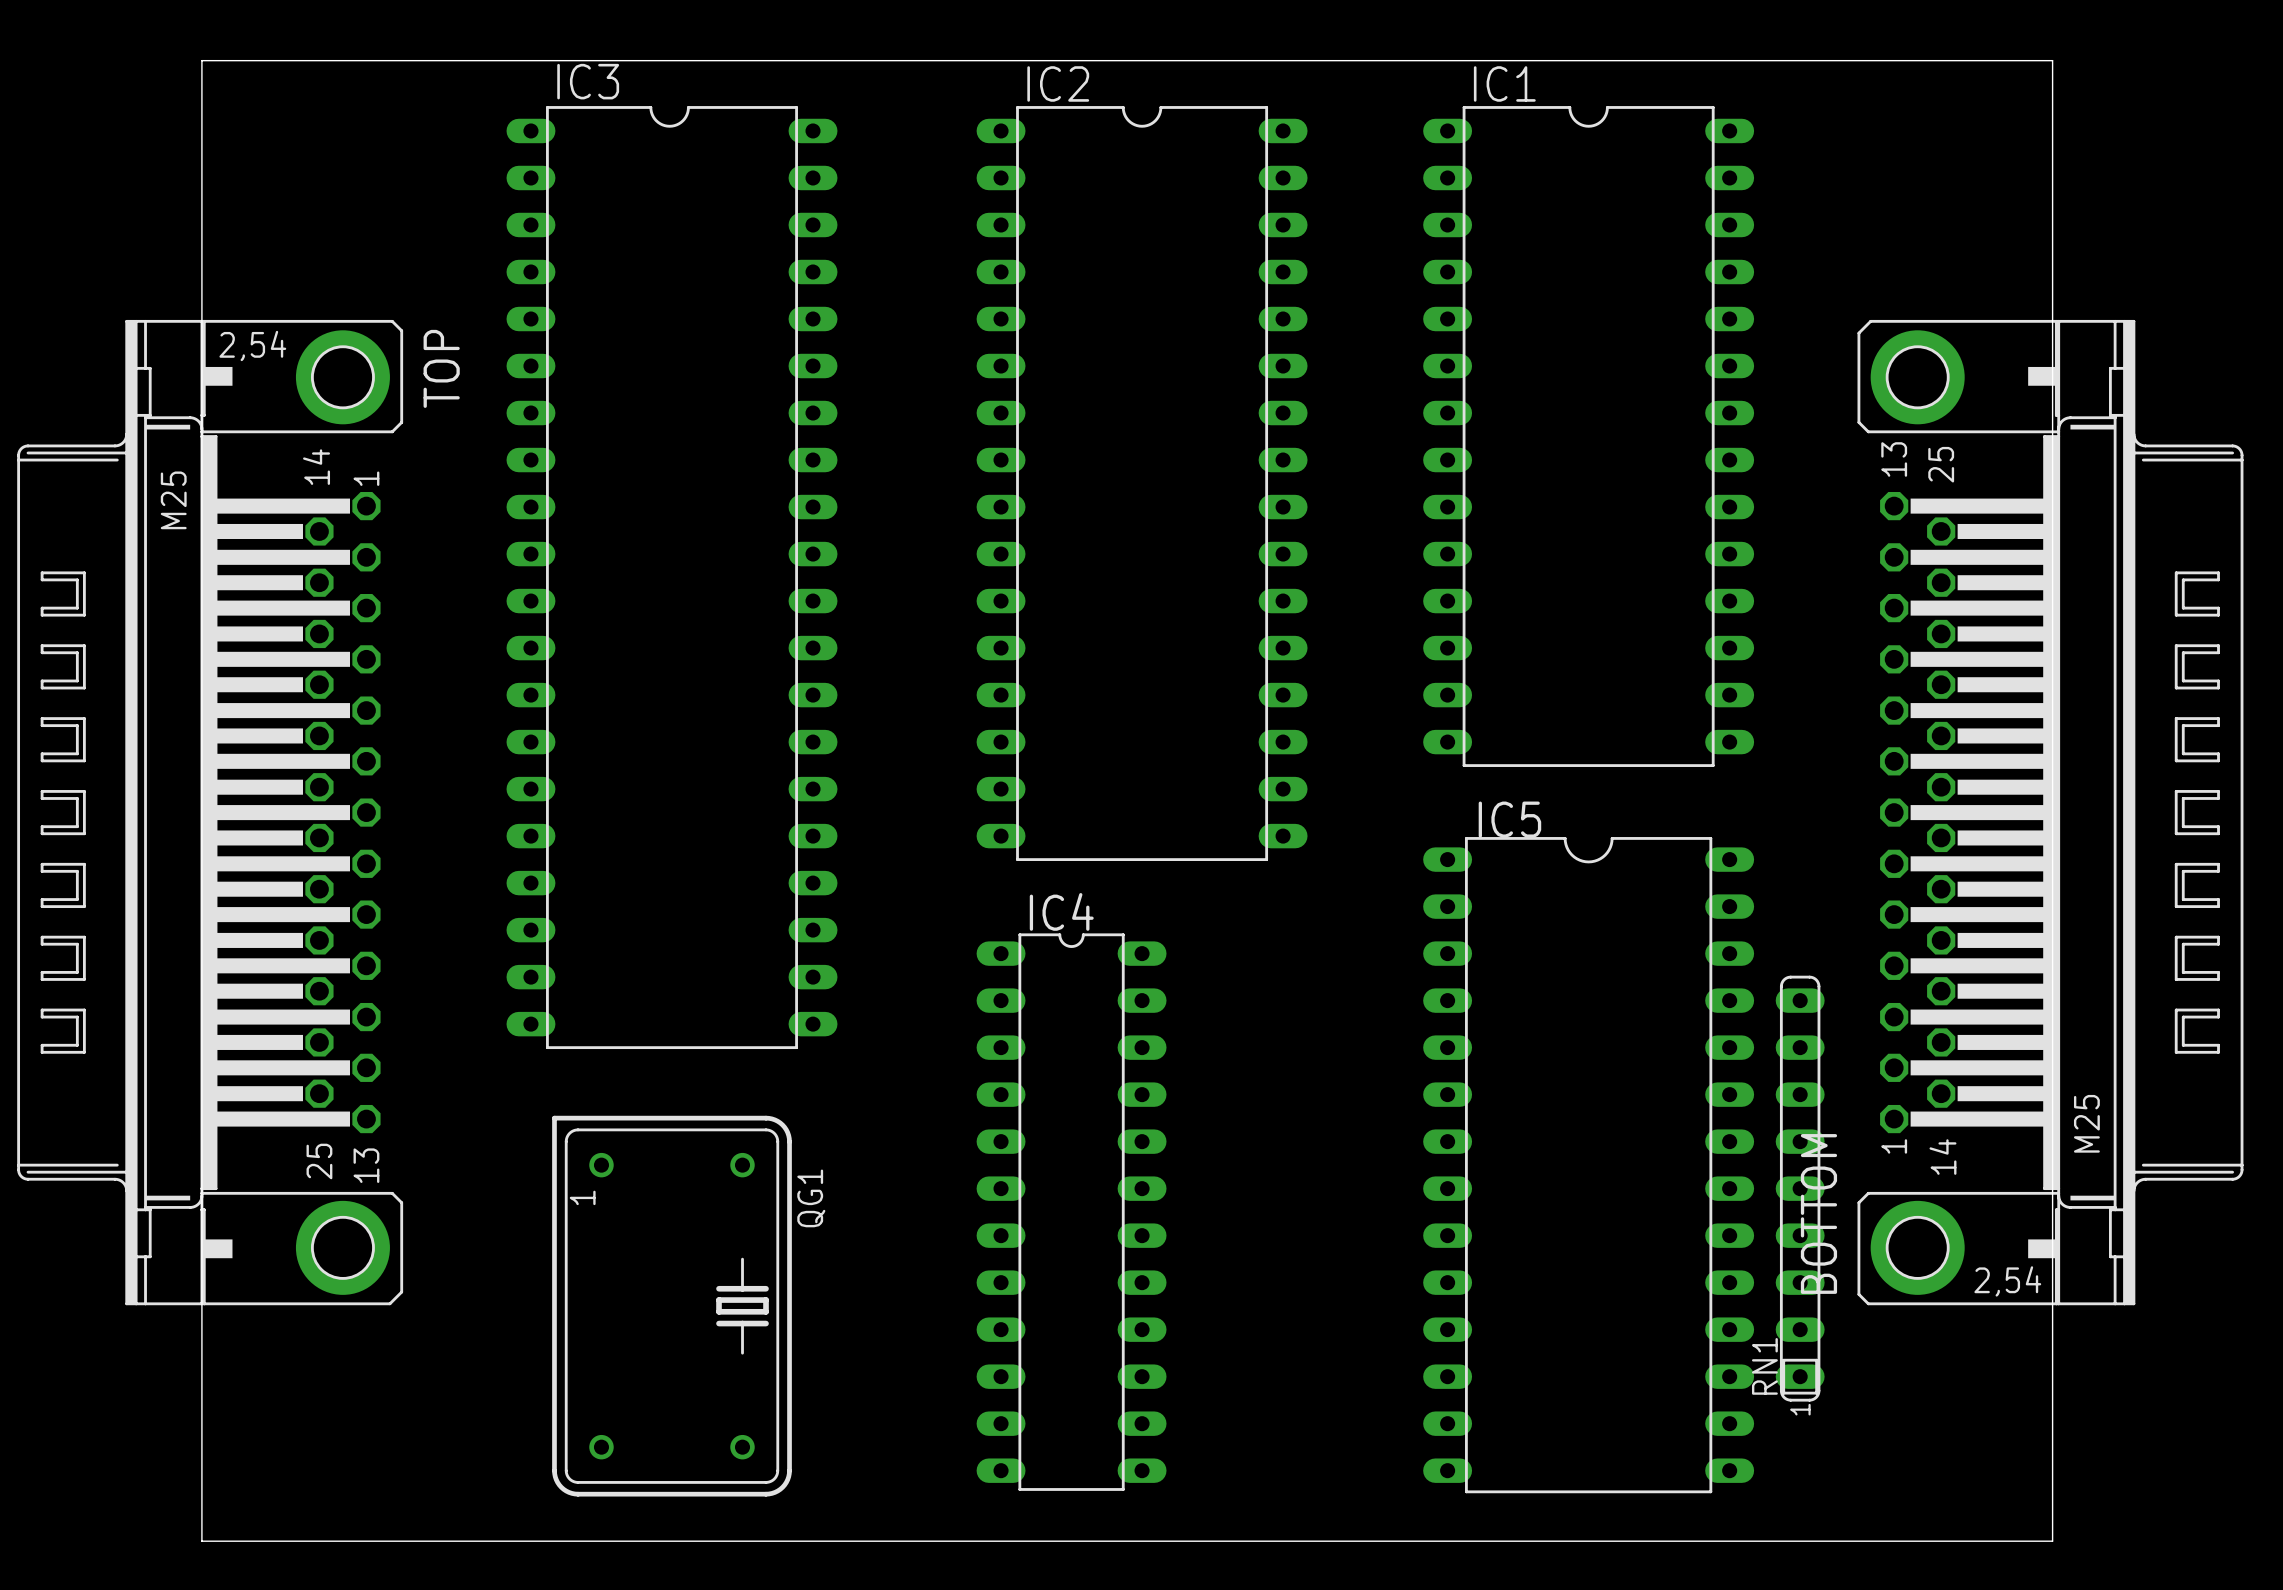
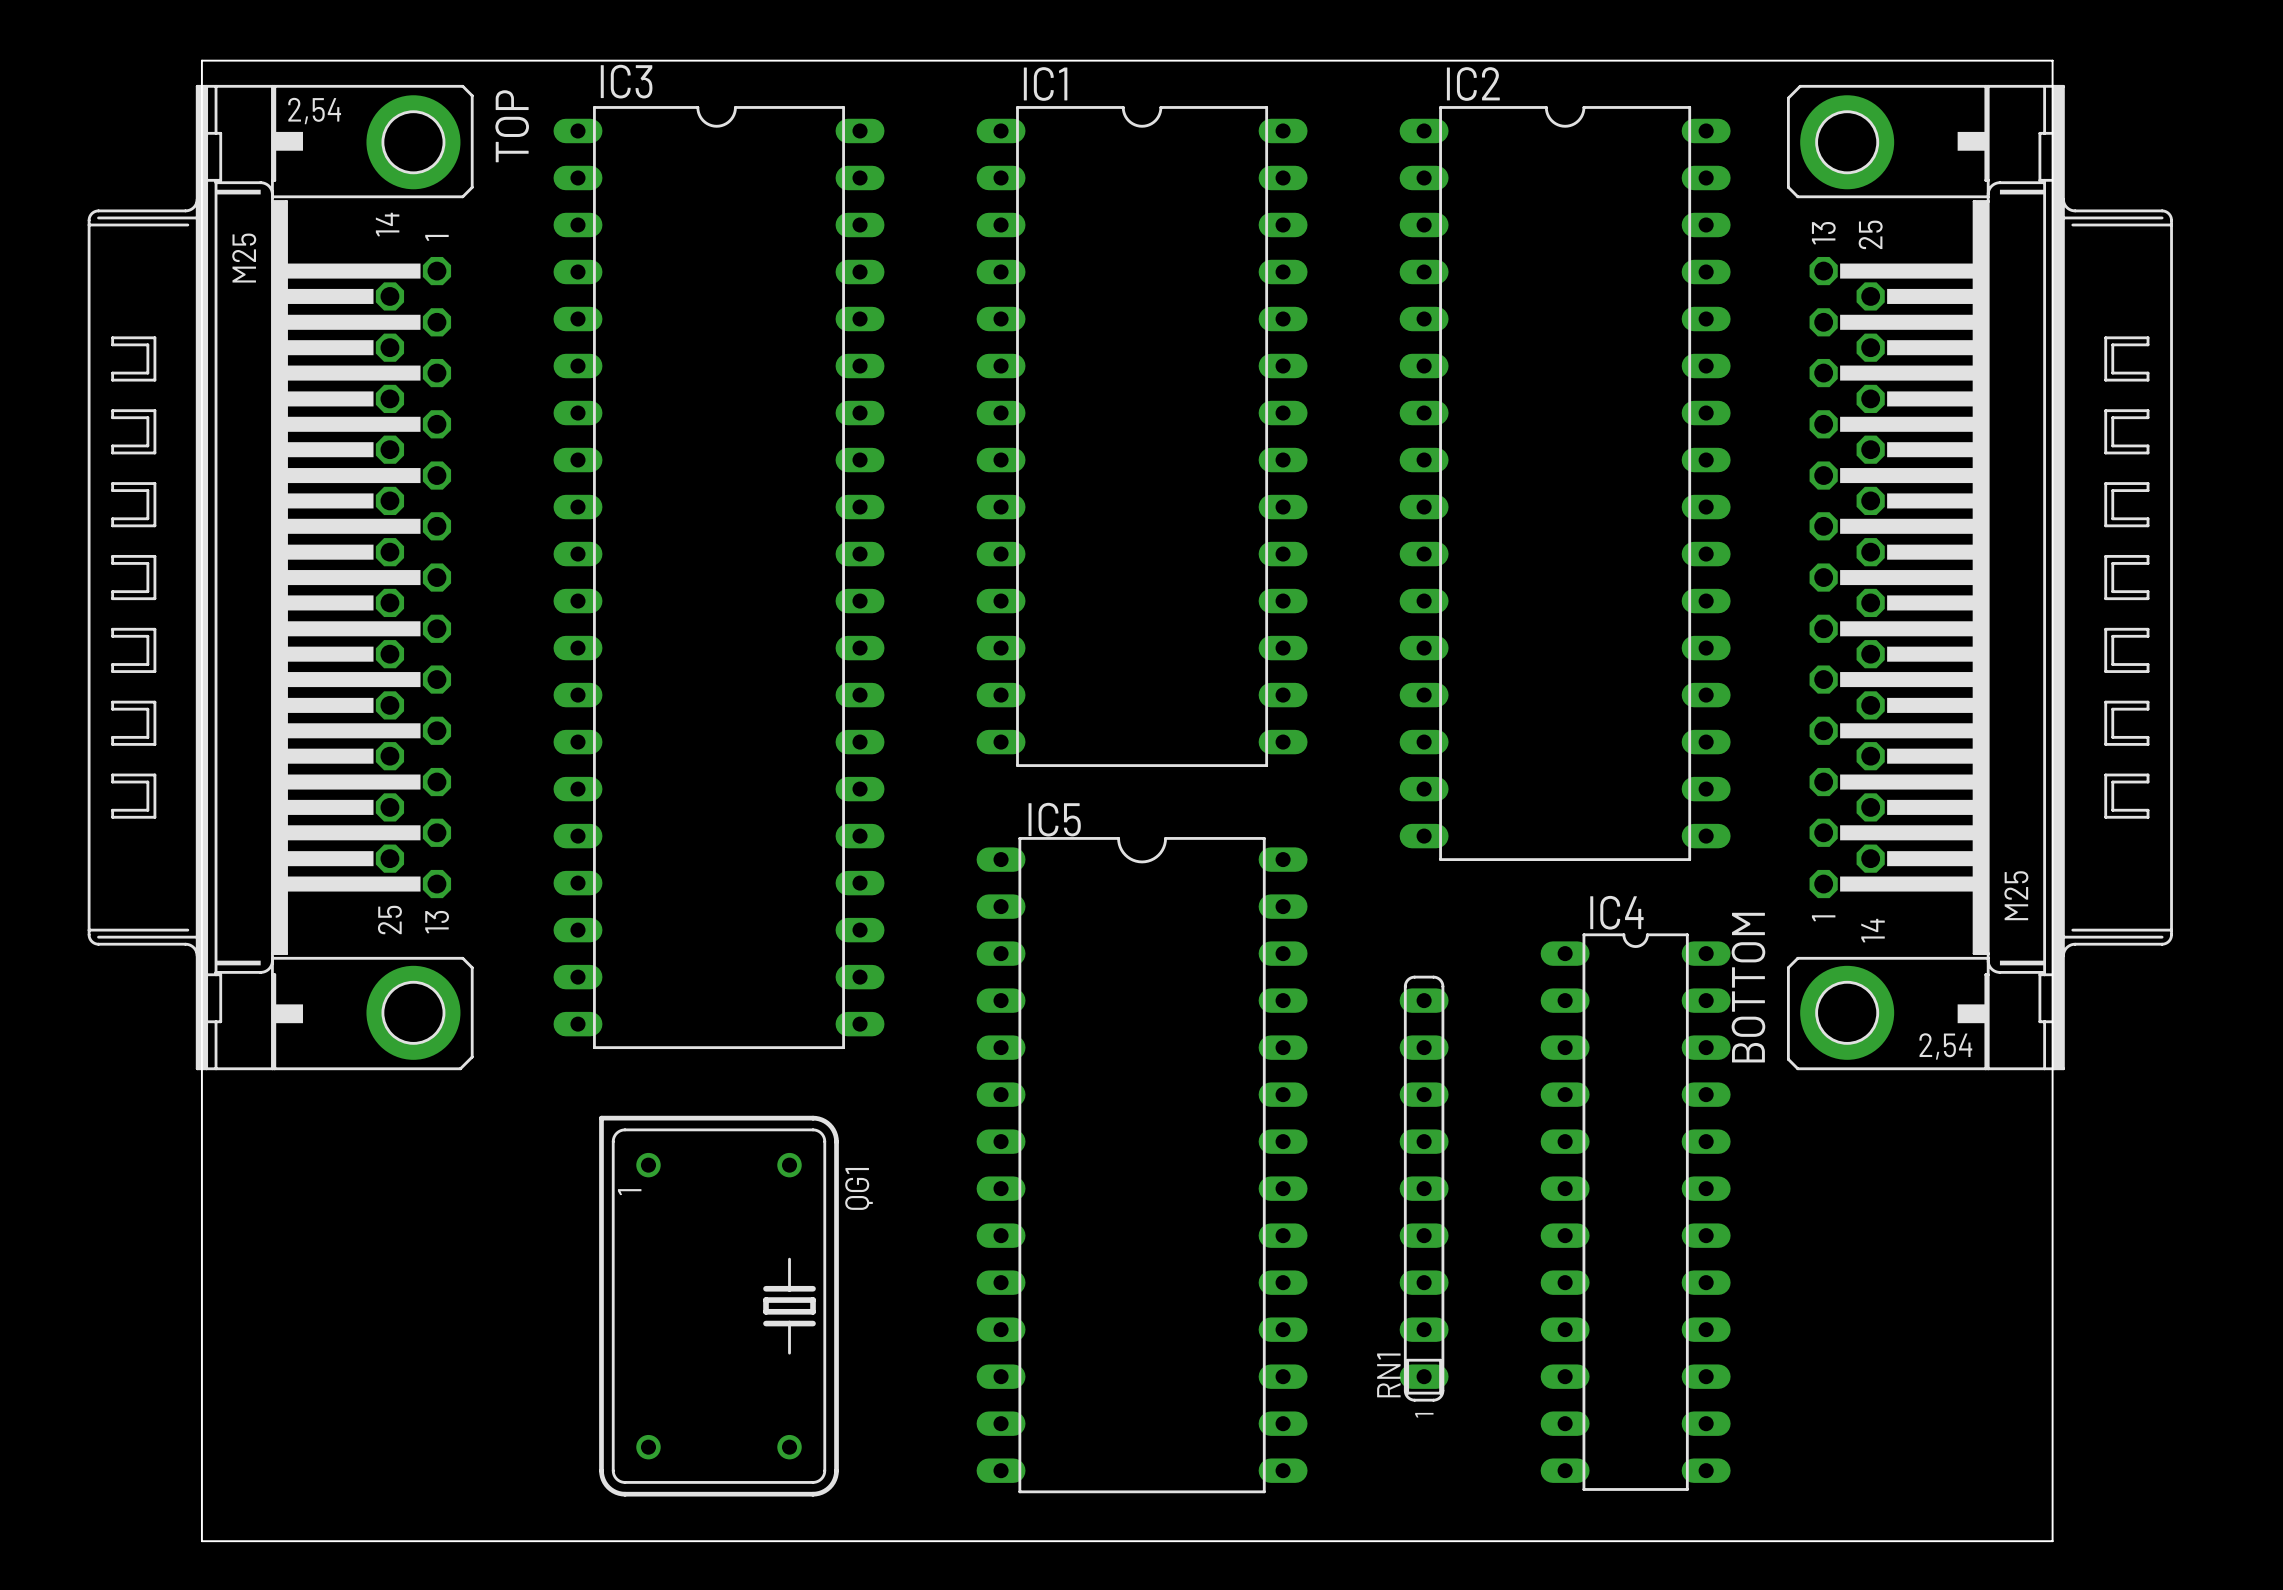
IC1 position: (1588, 436) -> (1142, 436)
IC2 position: (1142, 483) -> (1565, 483)
IC3 position: (671, 577) -> (719, 577)
TOP position: (210, 812) -> (280, 577)
BOTTOM position: (2050, 812) -> (1979, 577)
IC5 position: (1588, 1165) -> (1142, 1165)
RN1 position: (1800, 1188) -> (1424, 1188)
IC4 position: (1071, 1212) -> (1635, 1212)
QG1 position: (671, 1306) -> (719, 1306)

